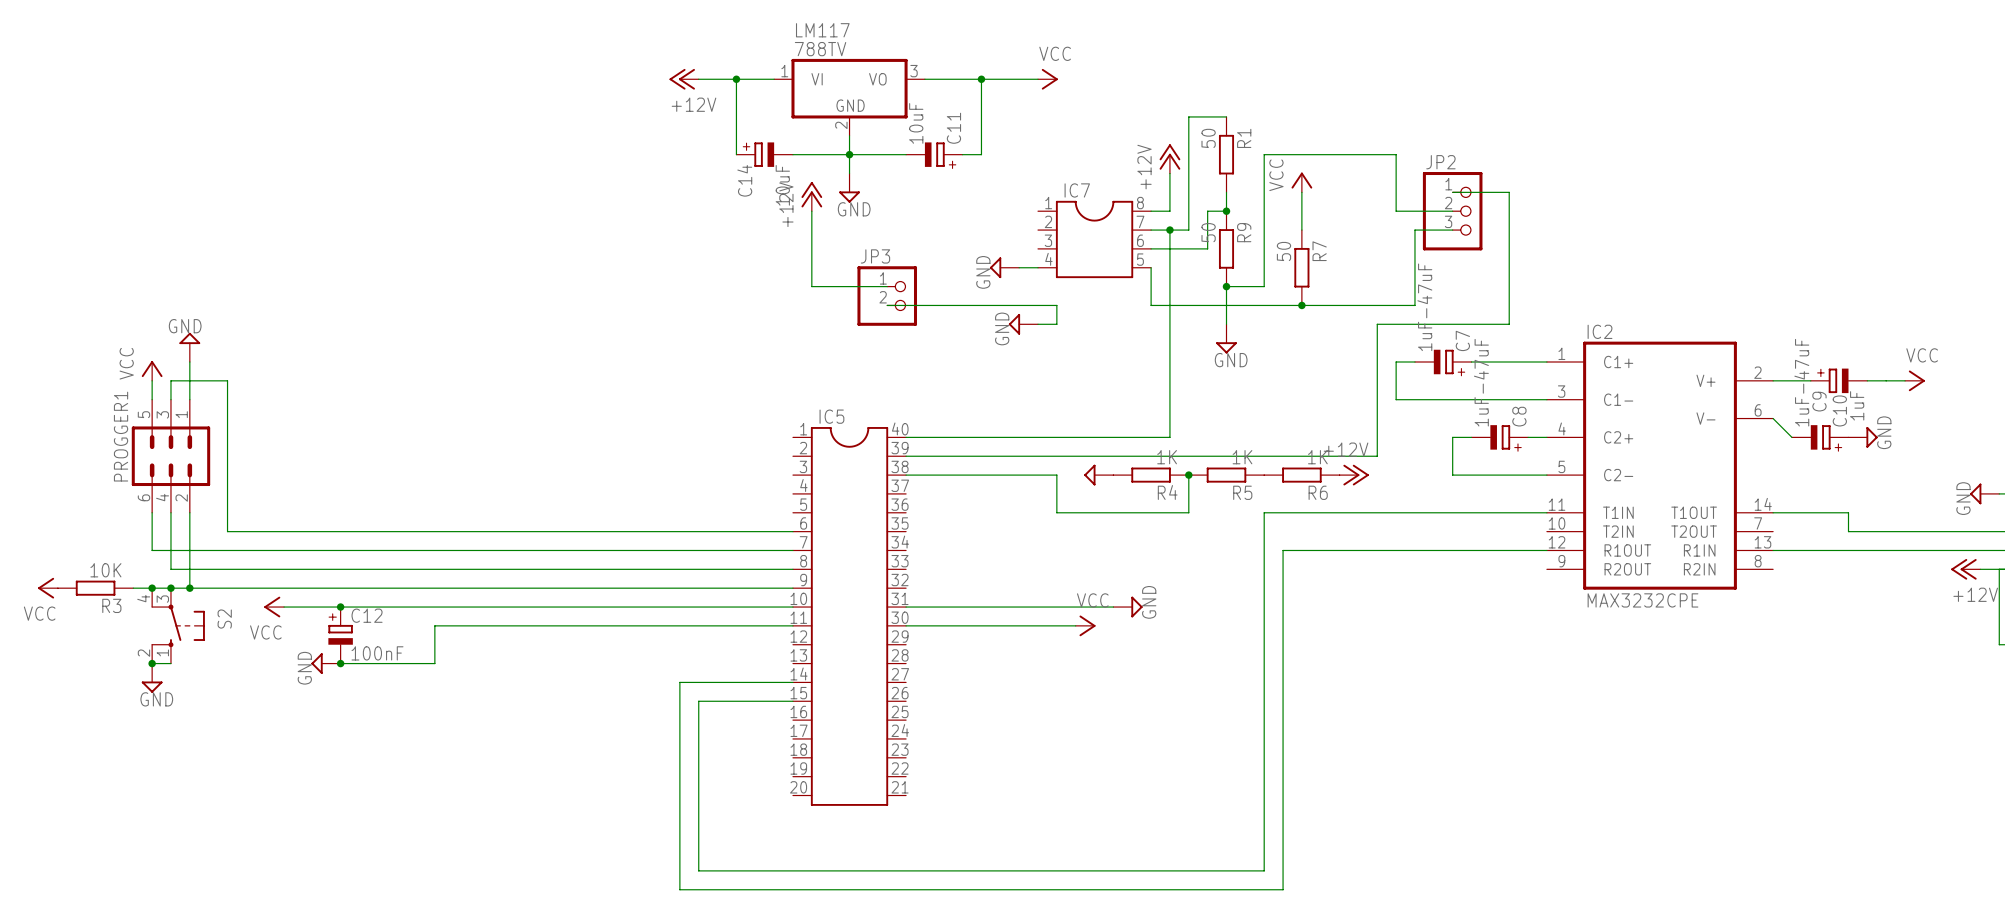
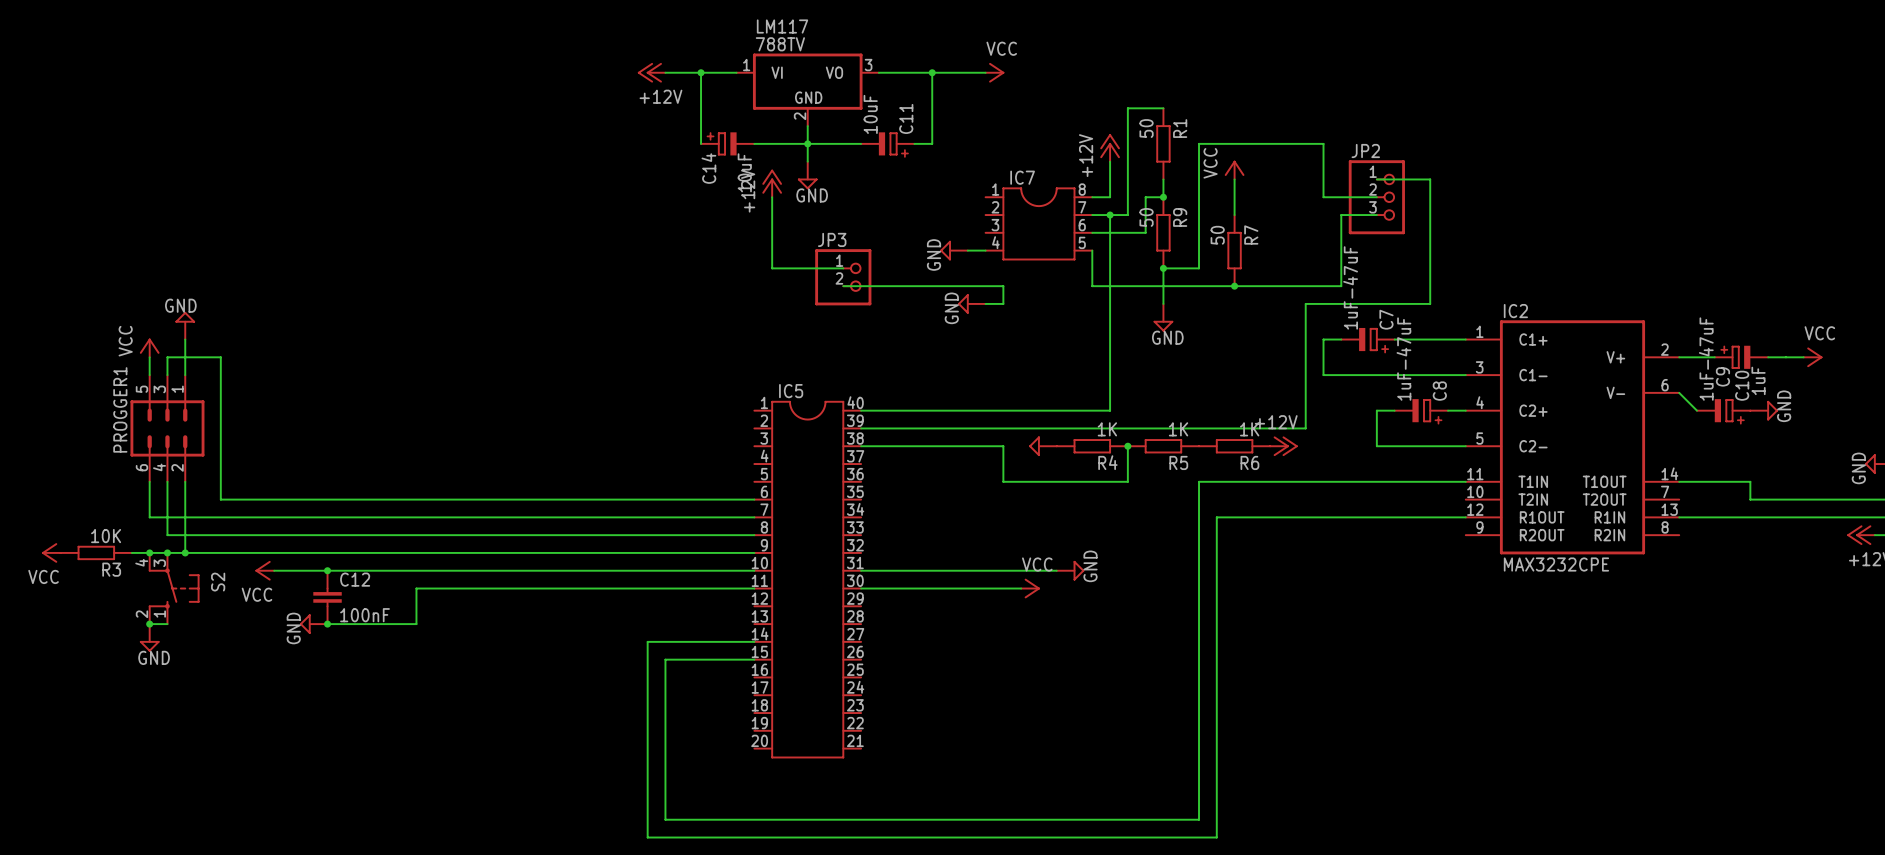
C12 symbol: [328, 607, 353, 664] -> [313, 570, 342, 625]

